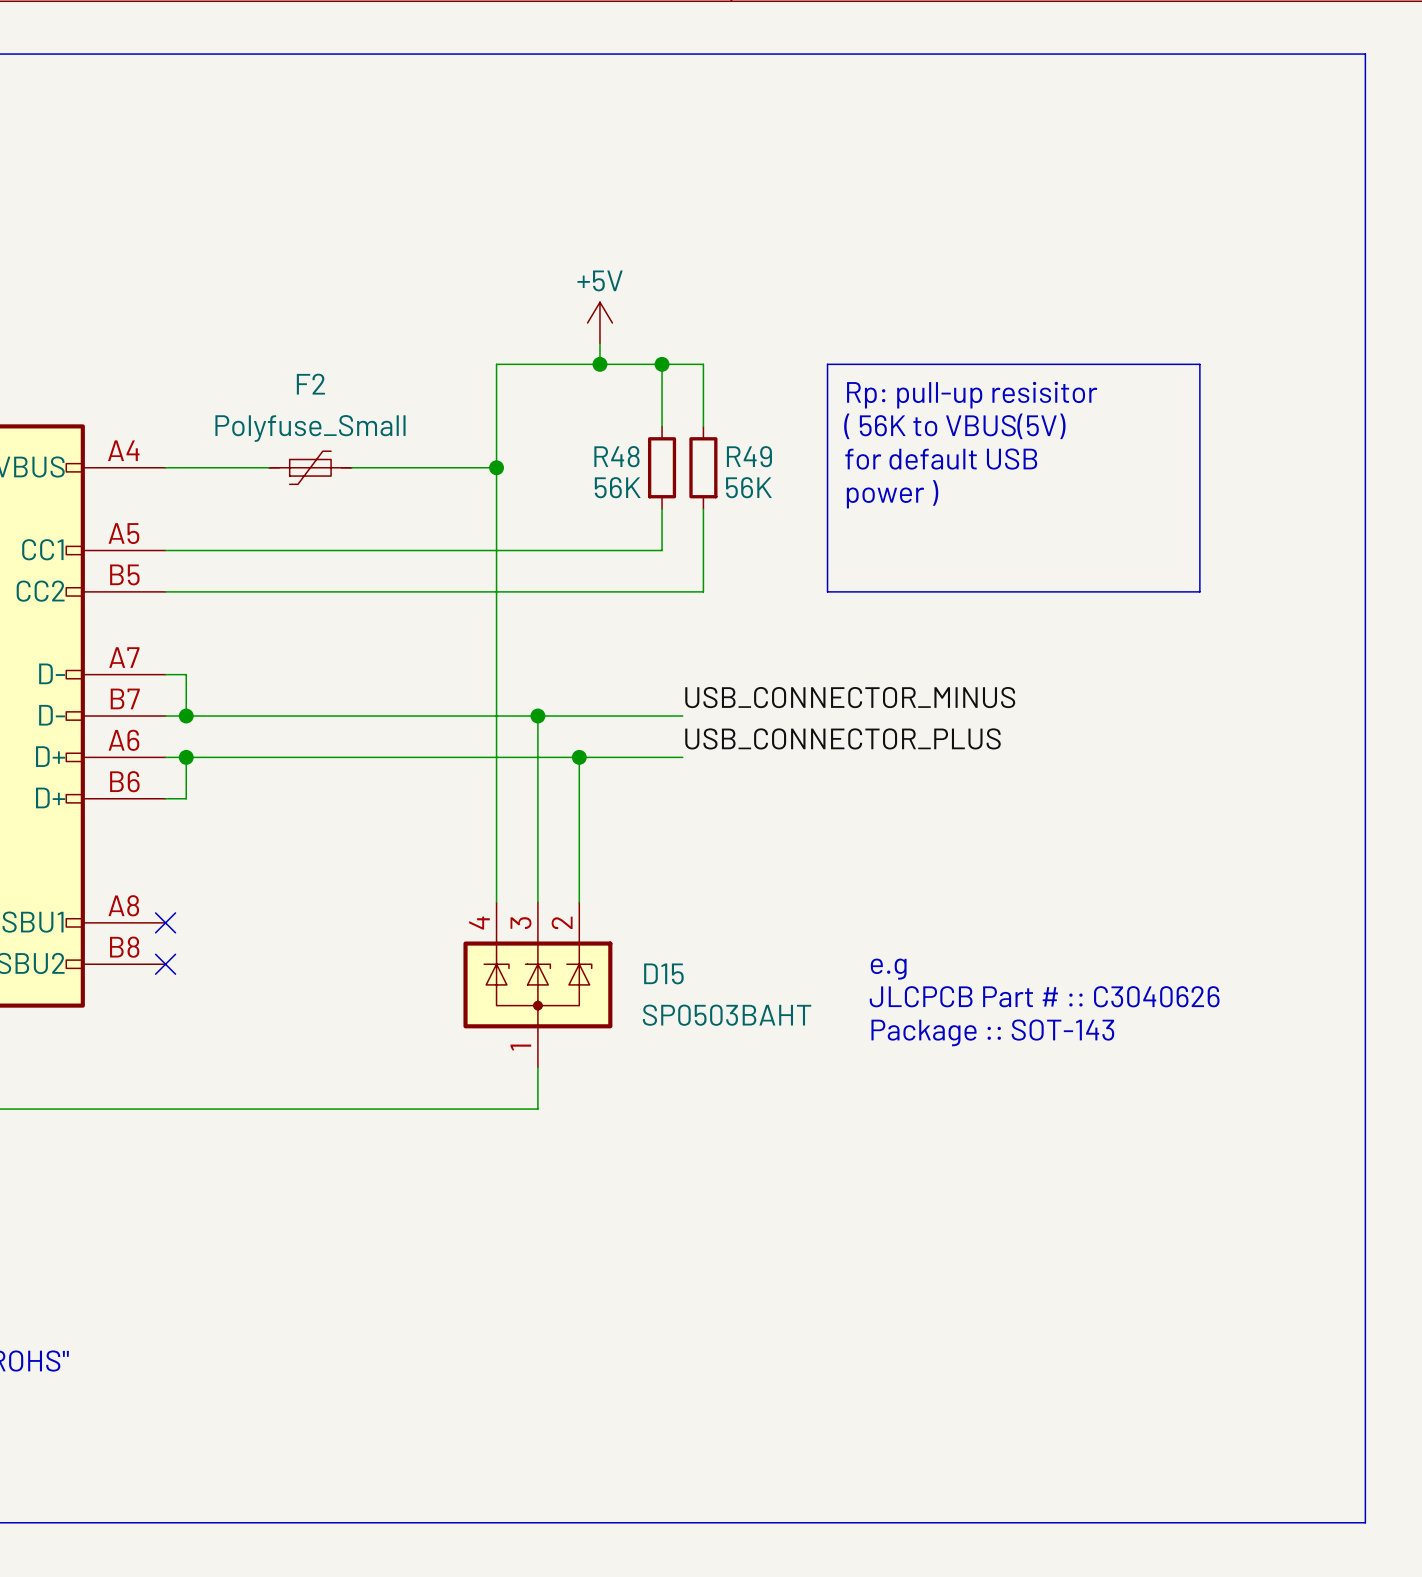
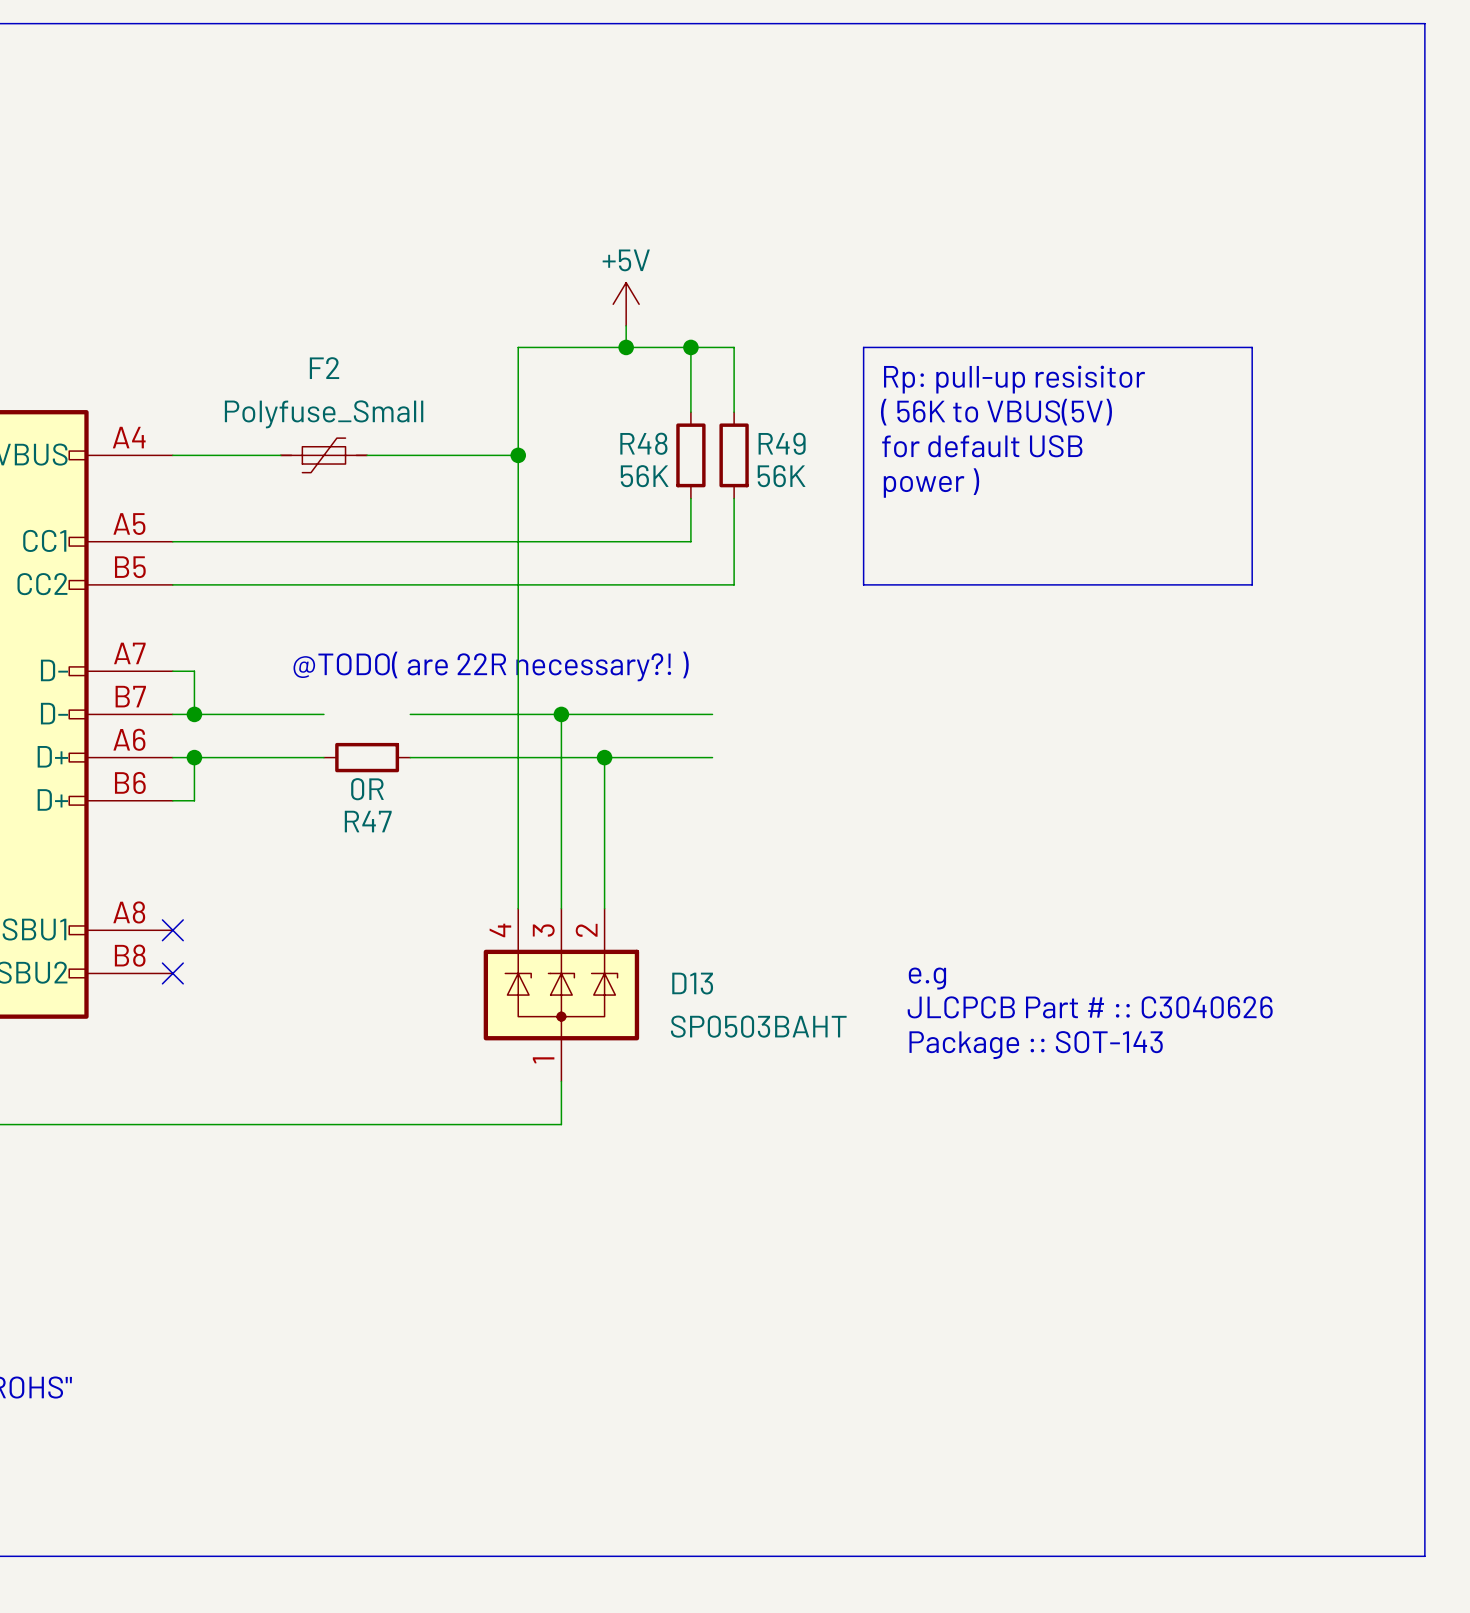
text: none -> @TODO( are 22R necessary?! ) (491, 666)
label: USB_CONNECTOR_MINUS (850, 697) -> none
wire: (310, 716) (393, 716) -> none
label: USB_CONNECTOR_PLUS (843, 738) -> none
wire: (310, 757) (393, 757) -> none
R47: none -> 0R (367, 757)
D15 name: D15 (663, 973) -> D13 (692, 983)

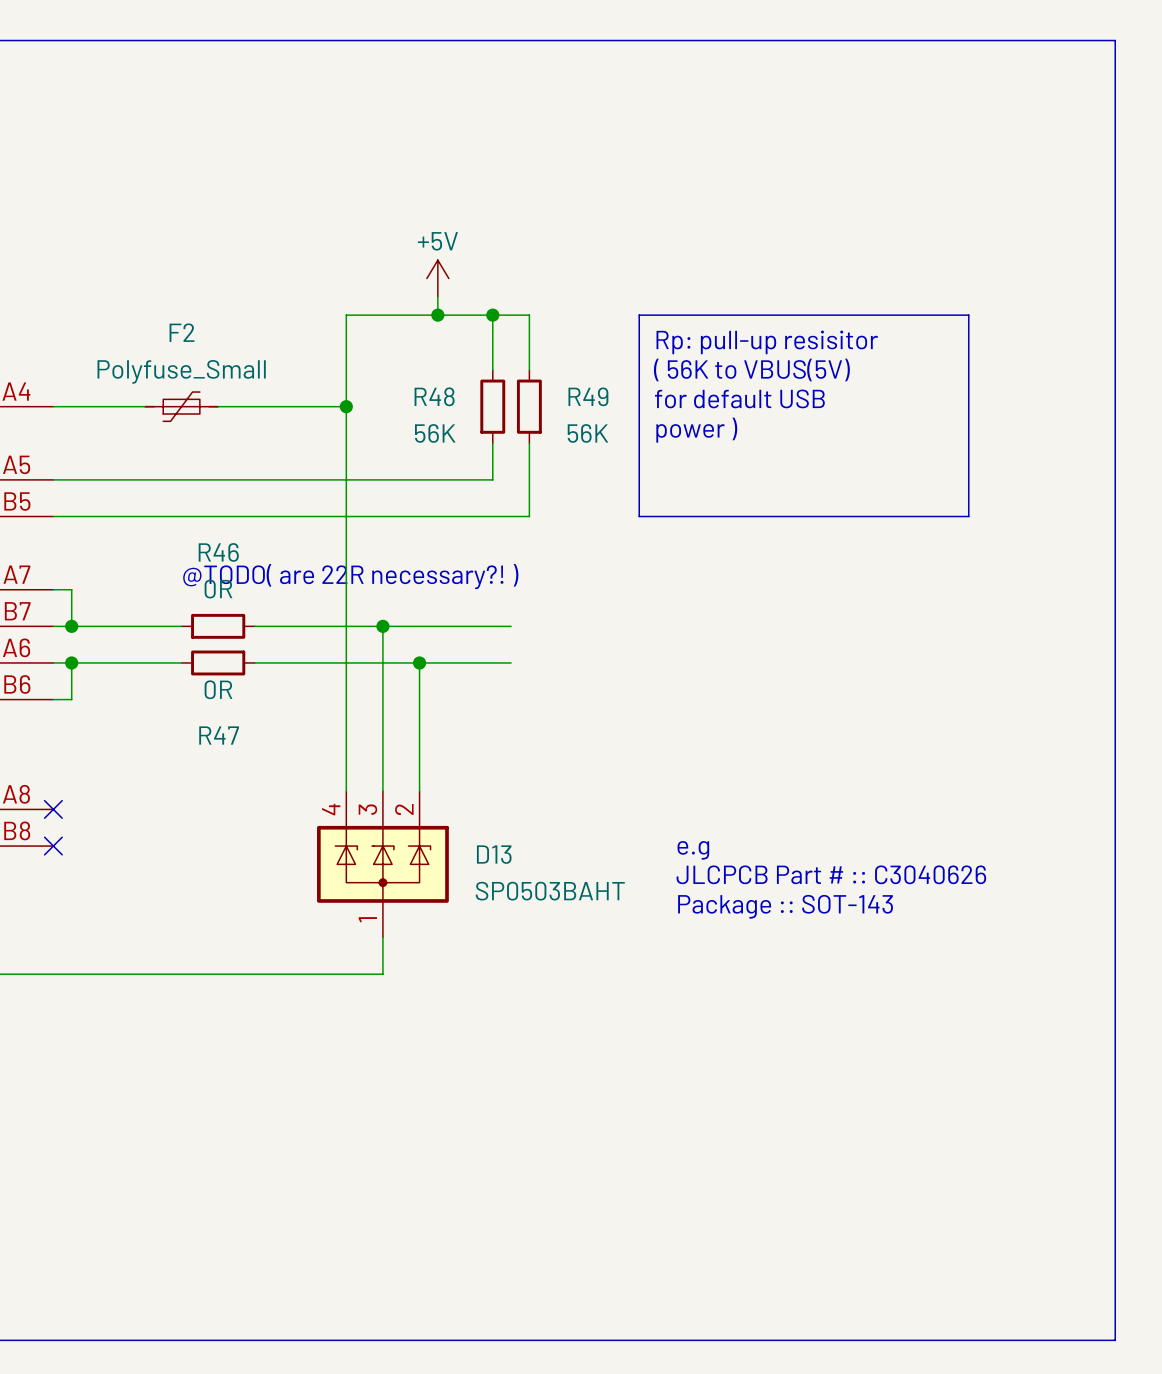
R48 name position: R48 (643, 443) -> R48 (434, 396)
R49 name position: R49 (782, 443) -> R49 (588, 396)
R48 value position: 56K (644, 476) -> 56K (435, 433)
R49 value position: 56K (781, 476) -> 56K (587, 433)
text position: @TODO( are 22R necessary?! ) (491, 666) -> @TODO( are 22R necessary?! ) (350, 576)
R46: none -> 0R (218, 626)
R47 name position: R47 (368, 821) -> R47 (219, 735)

